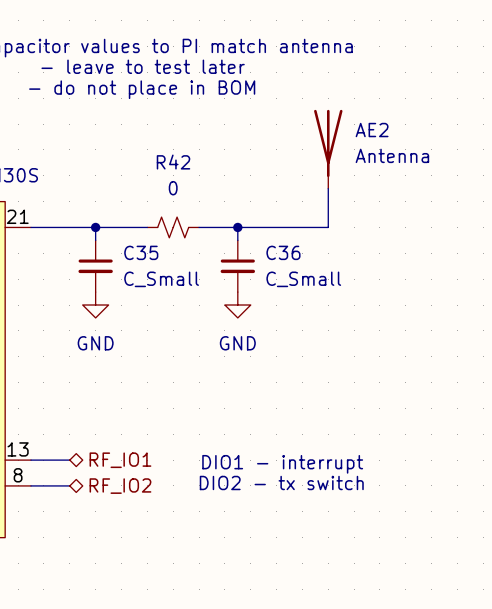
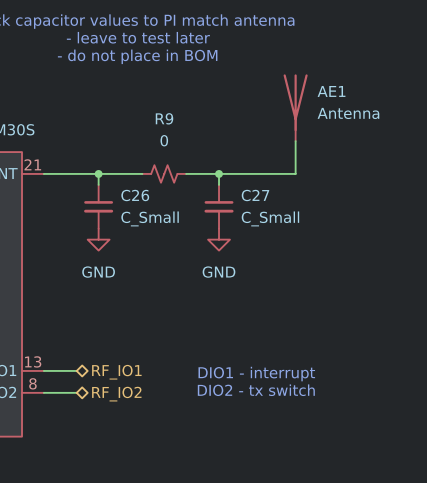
AE2 name: AE2 (372, 130) -> AE1 (331, 91)
R42 name: R42 (173, 162) -> R9 (164, 118)
C35 name: C35 (141, 252) -> C26 (135, 195)
C36 name: C36 (283, 252) -> C27 (255, 195)

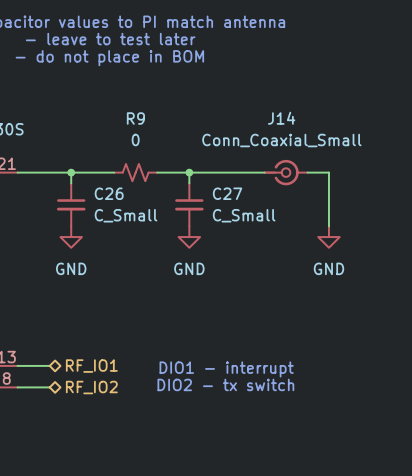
AE1: Antenna (295, 107) -> none
wire: (295, 141) (295, 173) -> none
J14: none -> Conn_Coaxial_Small (286, 172)
wire: none -> (307, 172) (328, 172) (328, 226)
power symbol: none -> GND (328, 237)

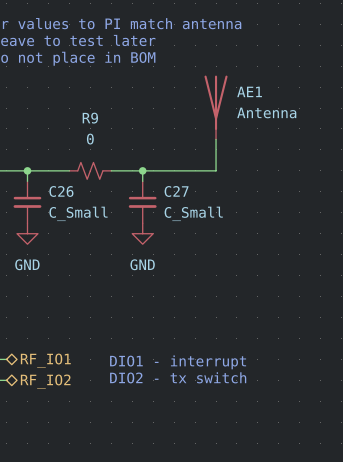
AE1: none -> Antenna (216, 107)
wire: none -> (216, 139) (216, 170)
J14: Conn_Coaxial_Small (286, 172) -> none
wire: (307, 172) (328, 172) (328, 226) -> none
power symbol: GND (328, 237) -> none

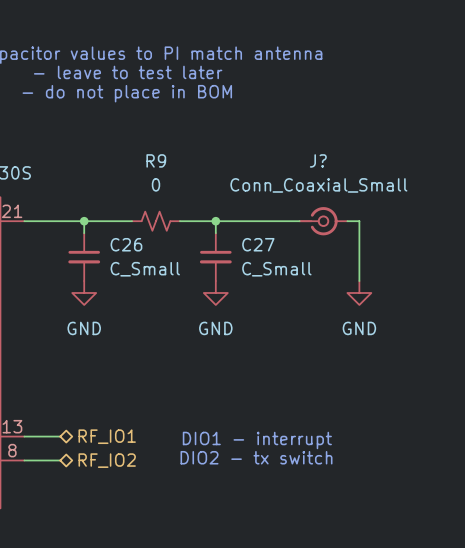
AE1: Antenna (216, 107) -> none
wire: (216, 139) (216, 170) -> none
J?: none -> Conn_Coaxial_Small (323, 221)
wire: none -> (347, 221) (359, 221) (359, 281)
power symbol: none -> GND (359, 292)

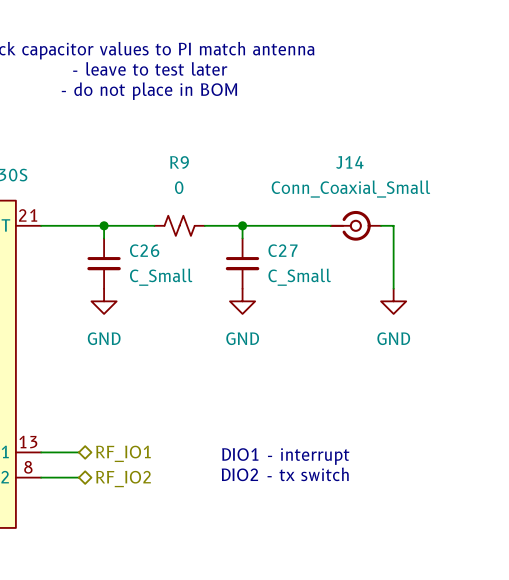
J? name: J? (318, 160) -> J14 (349, 162)

